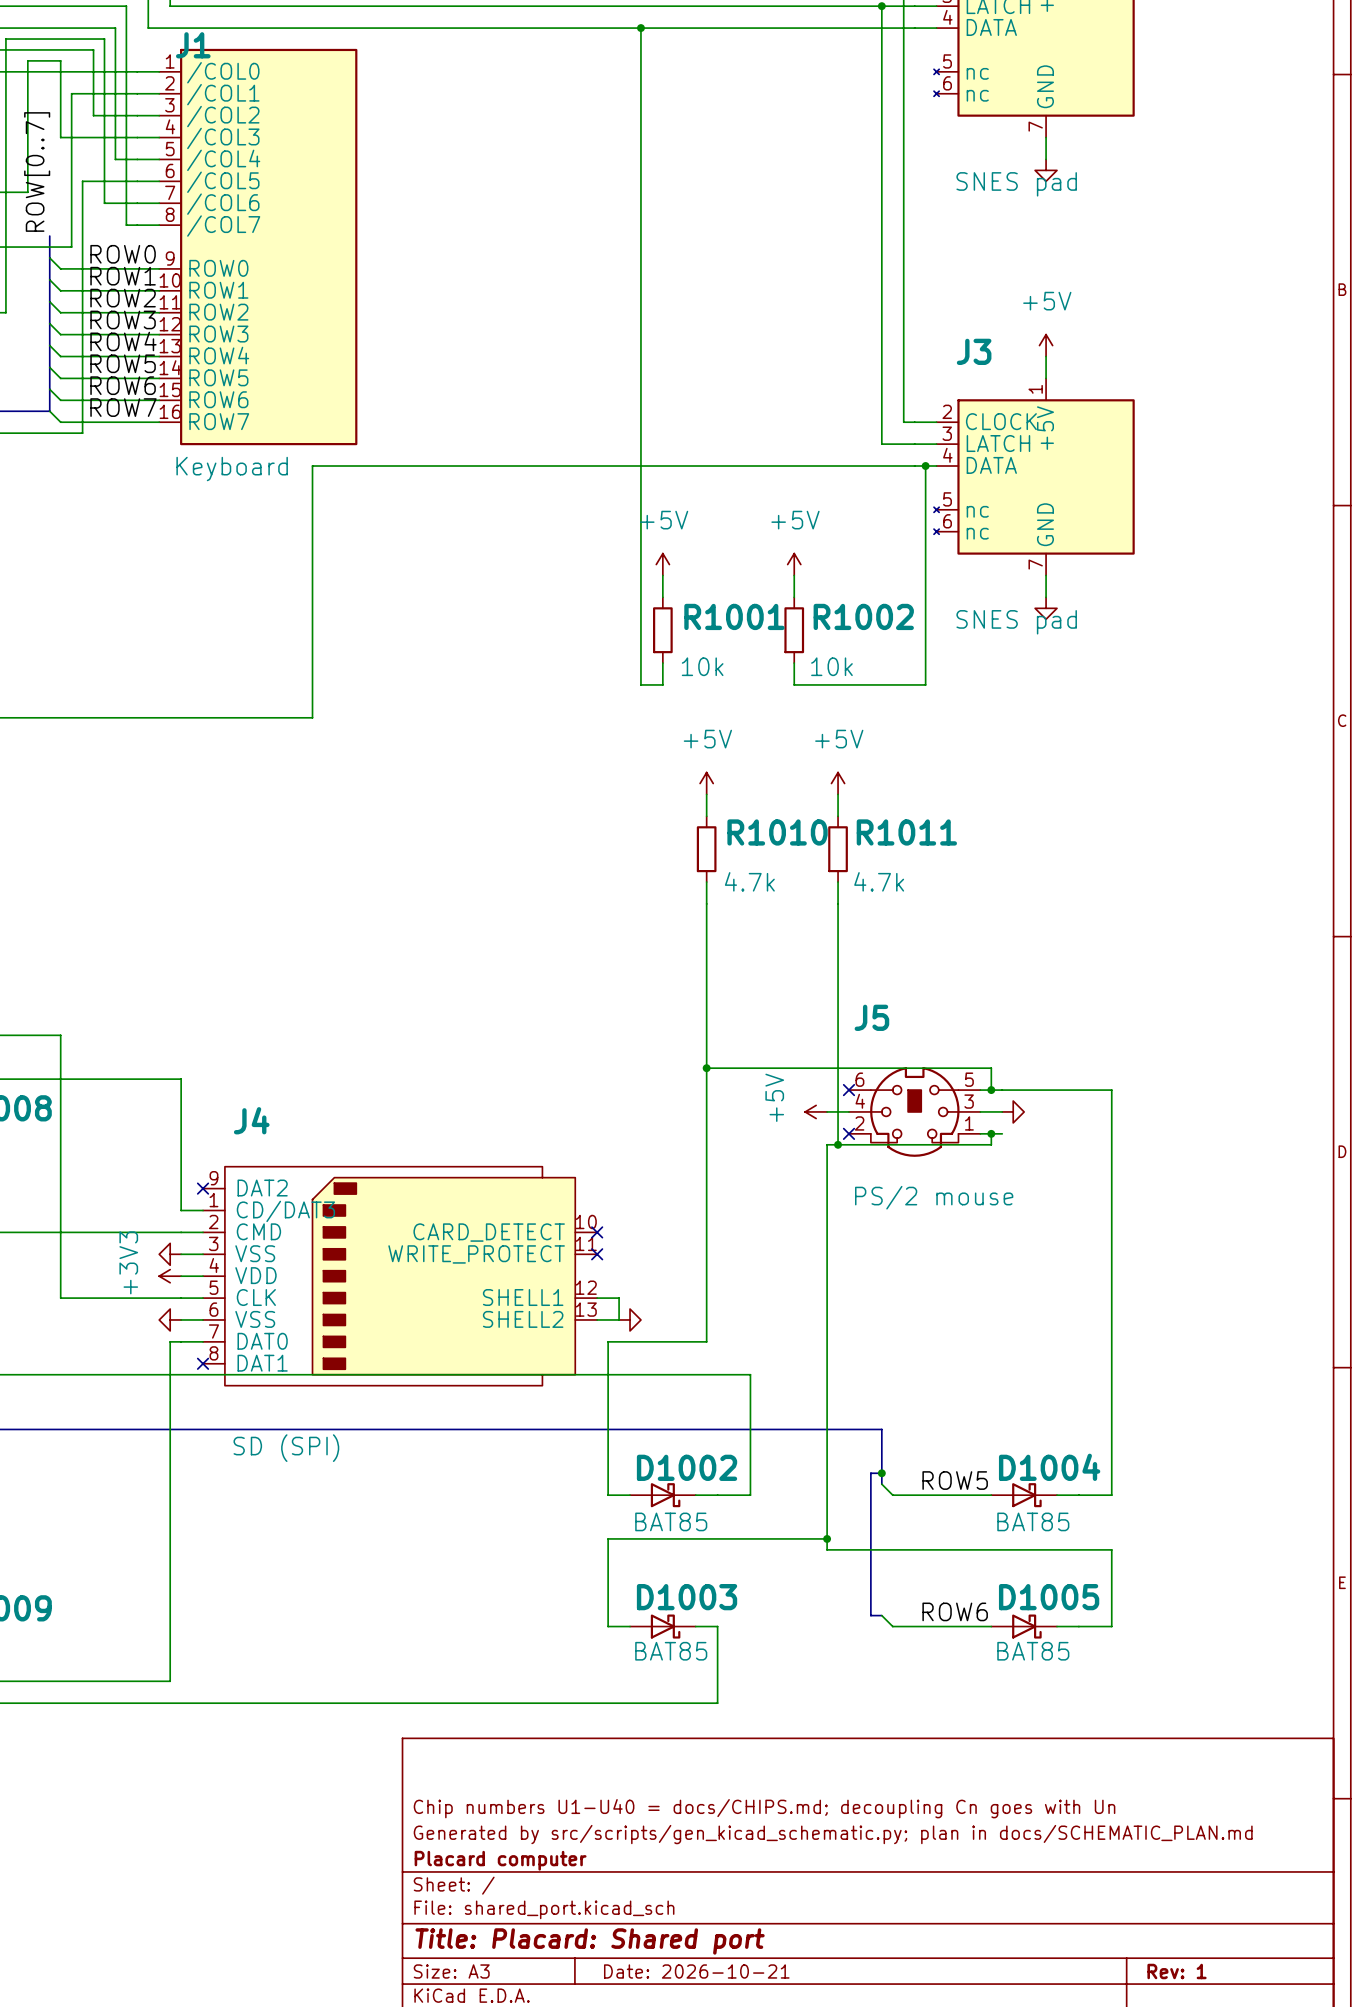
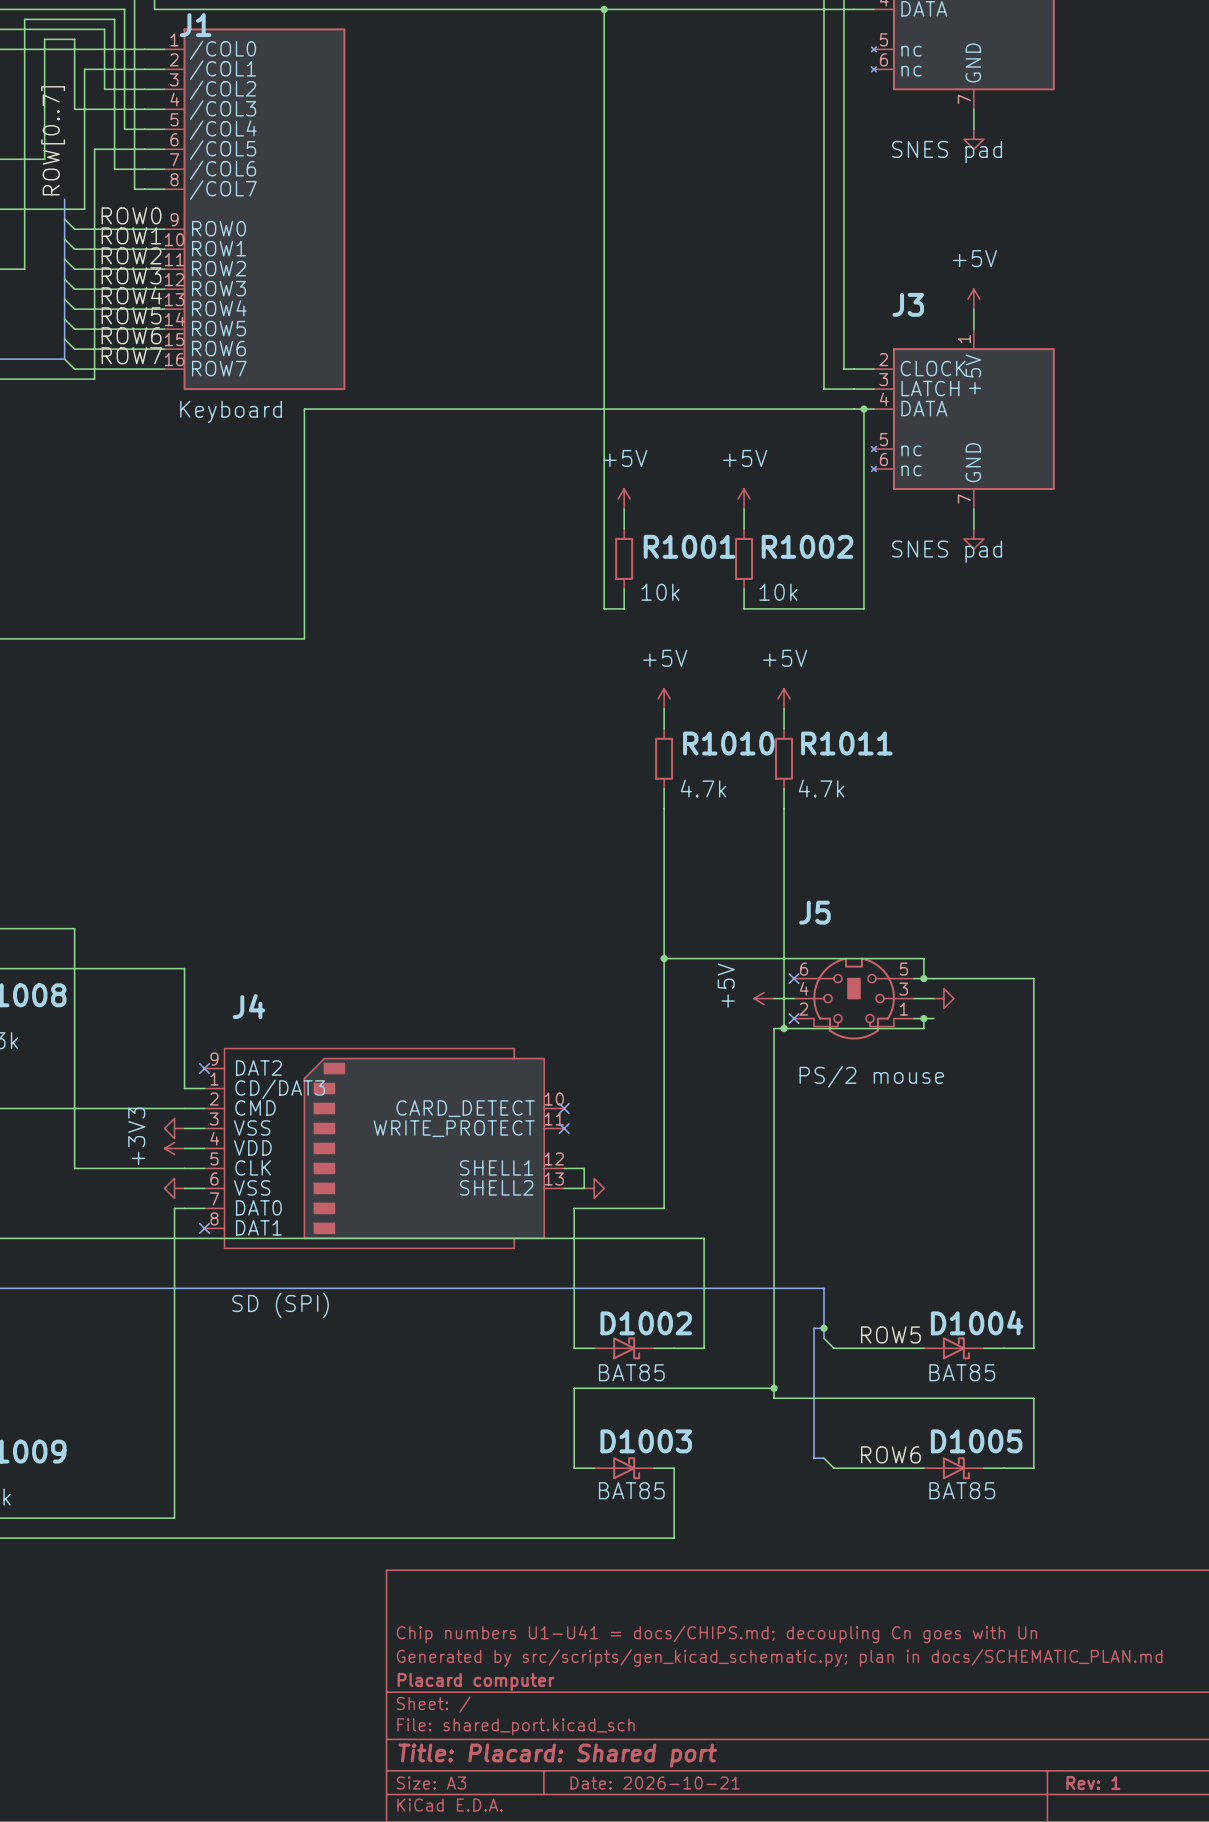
title block: Chip numbers U1-U40 = docs/CHIPS.md; decoupling Cn goes with Un (764, 1808) -> Chip numbers U1-U41 = docs/CHIPS.md; decoupling Cn goes with Un (716, 1634)

